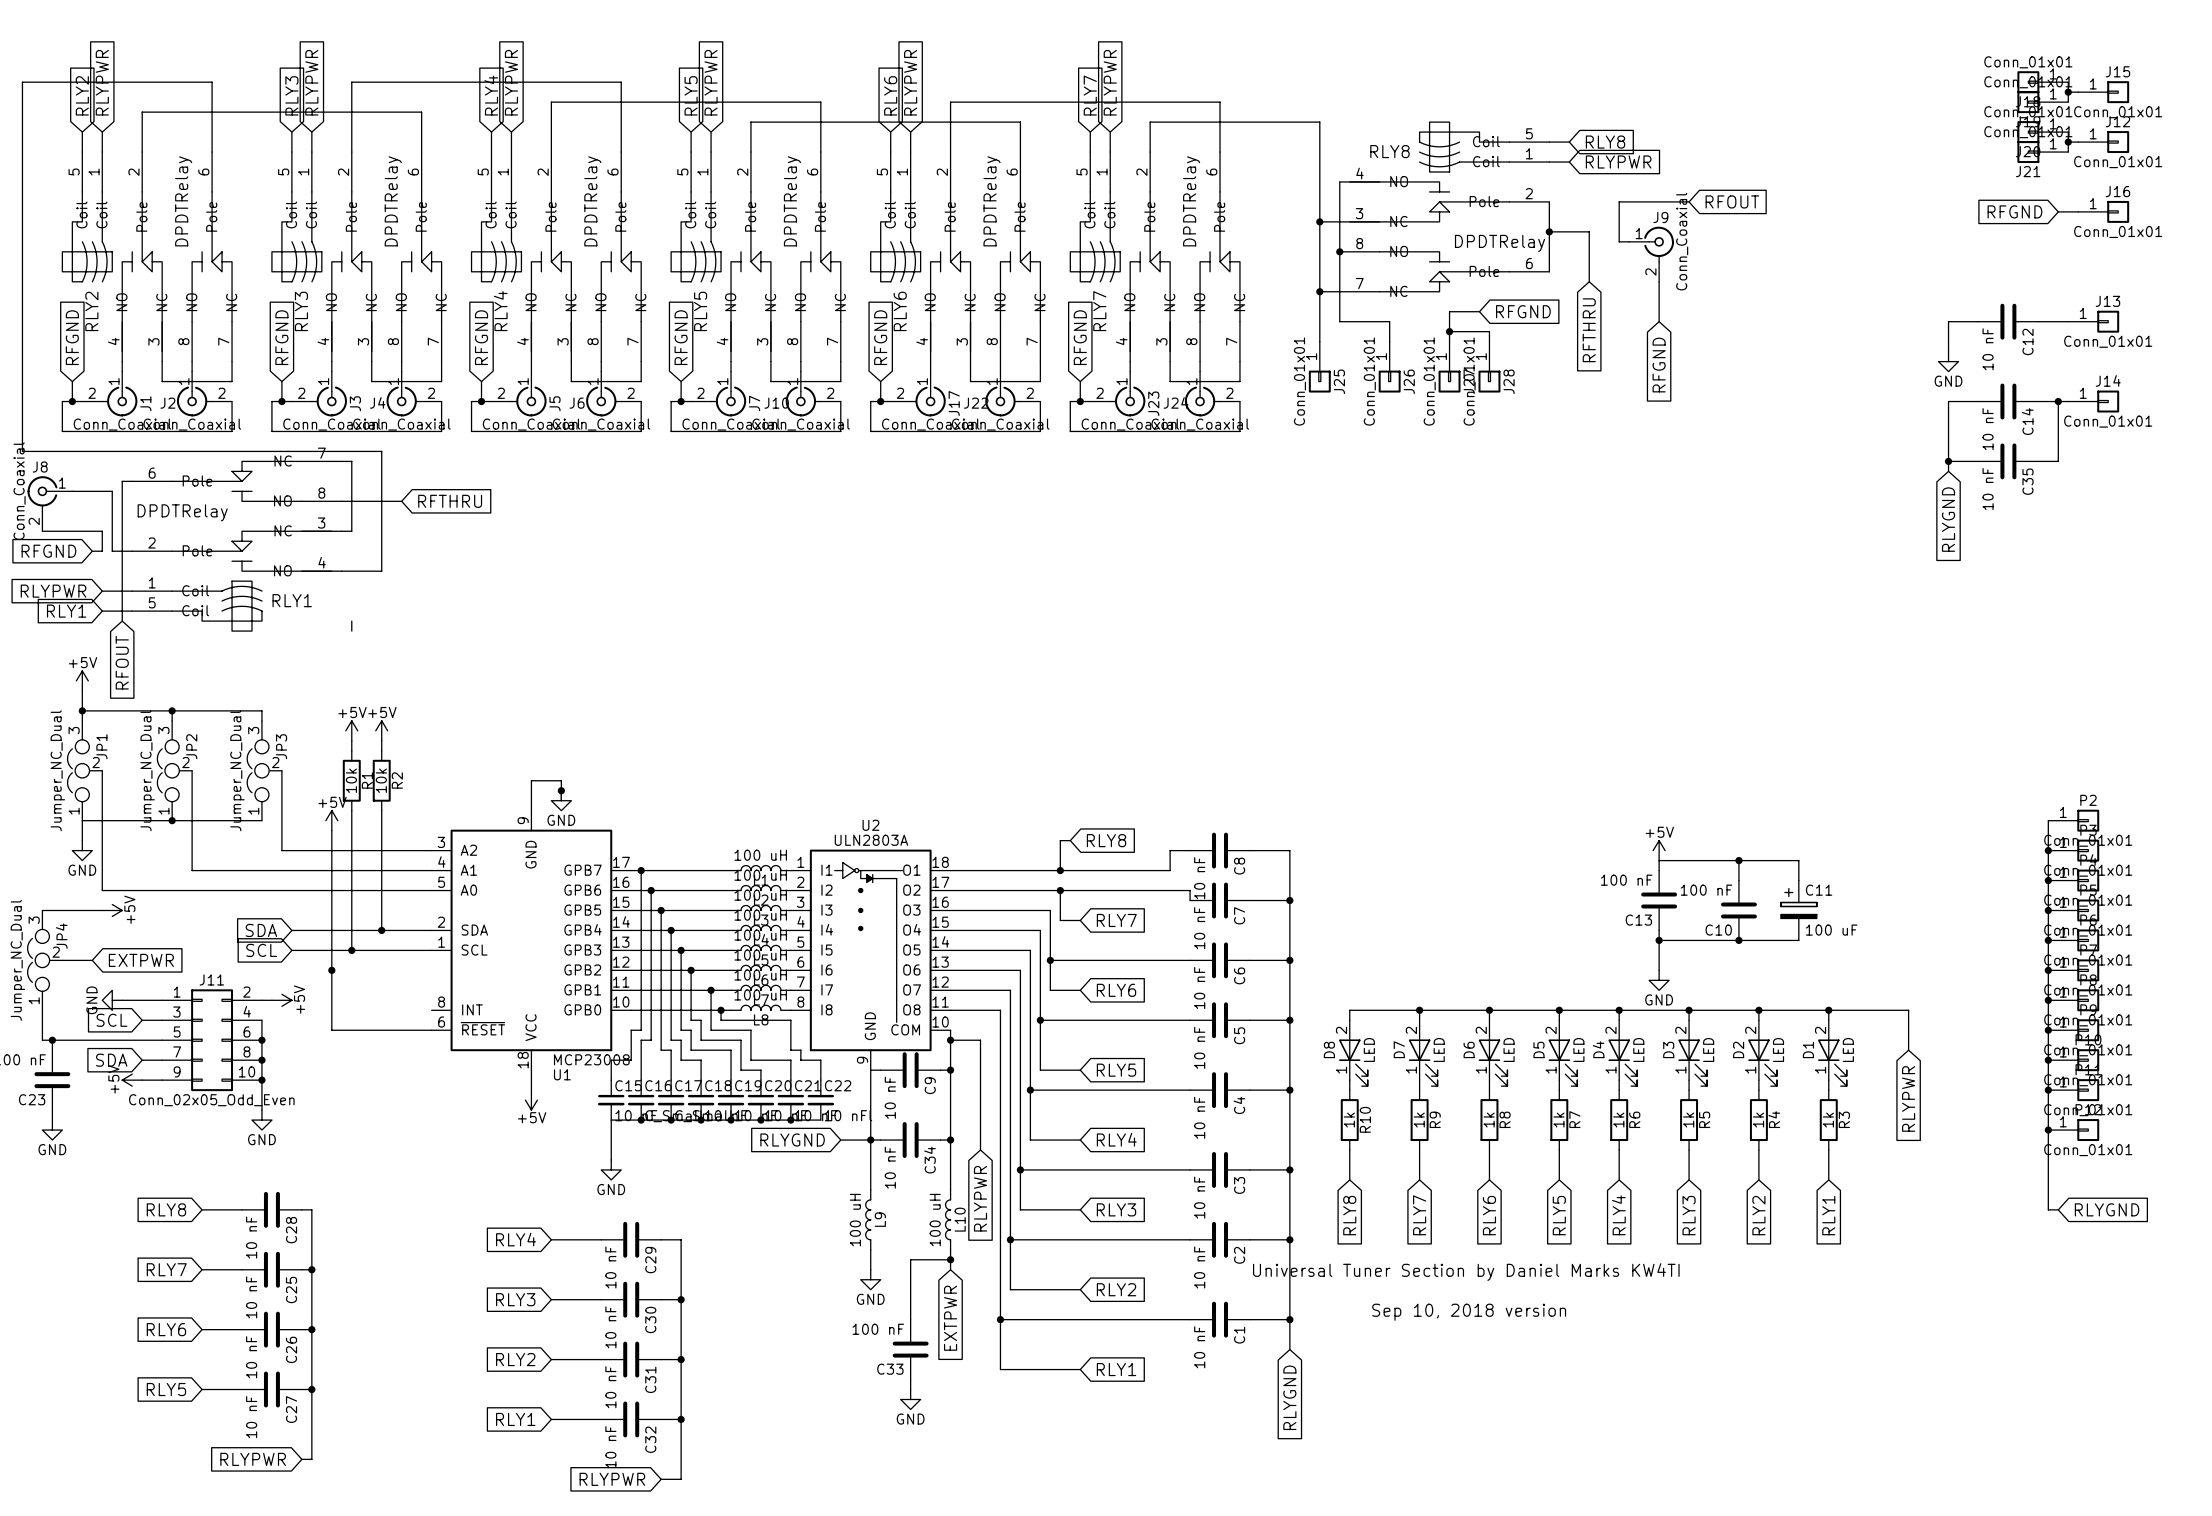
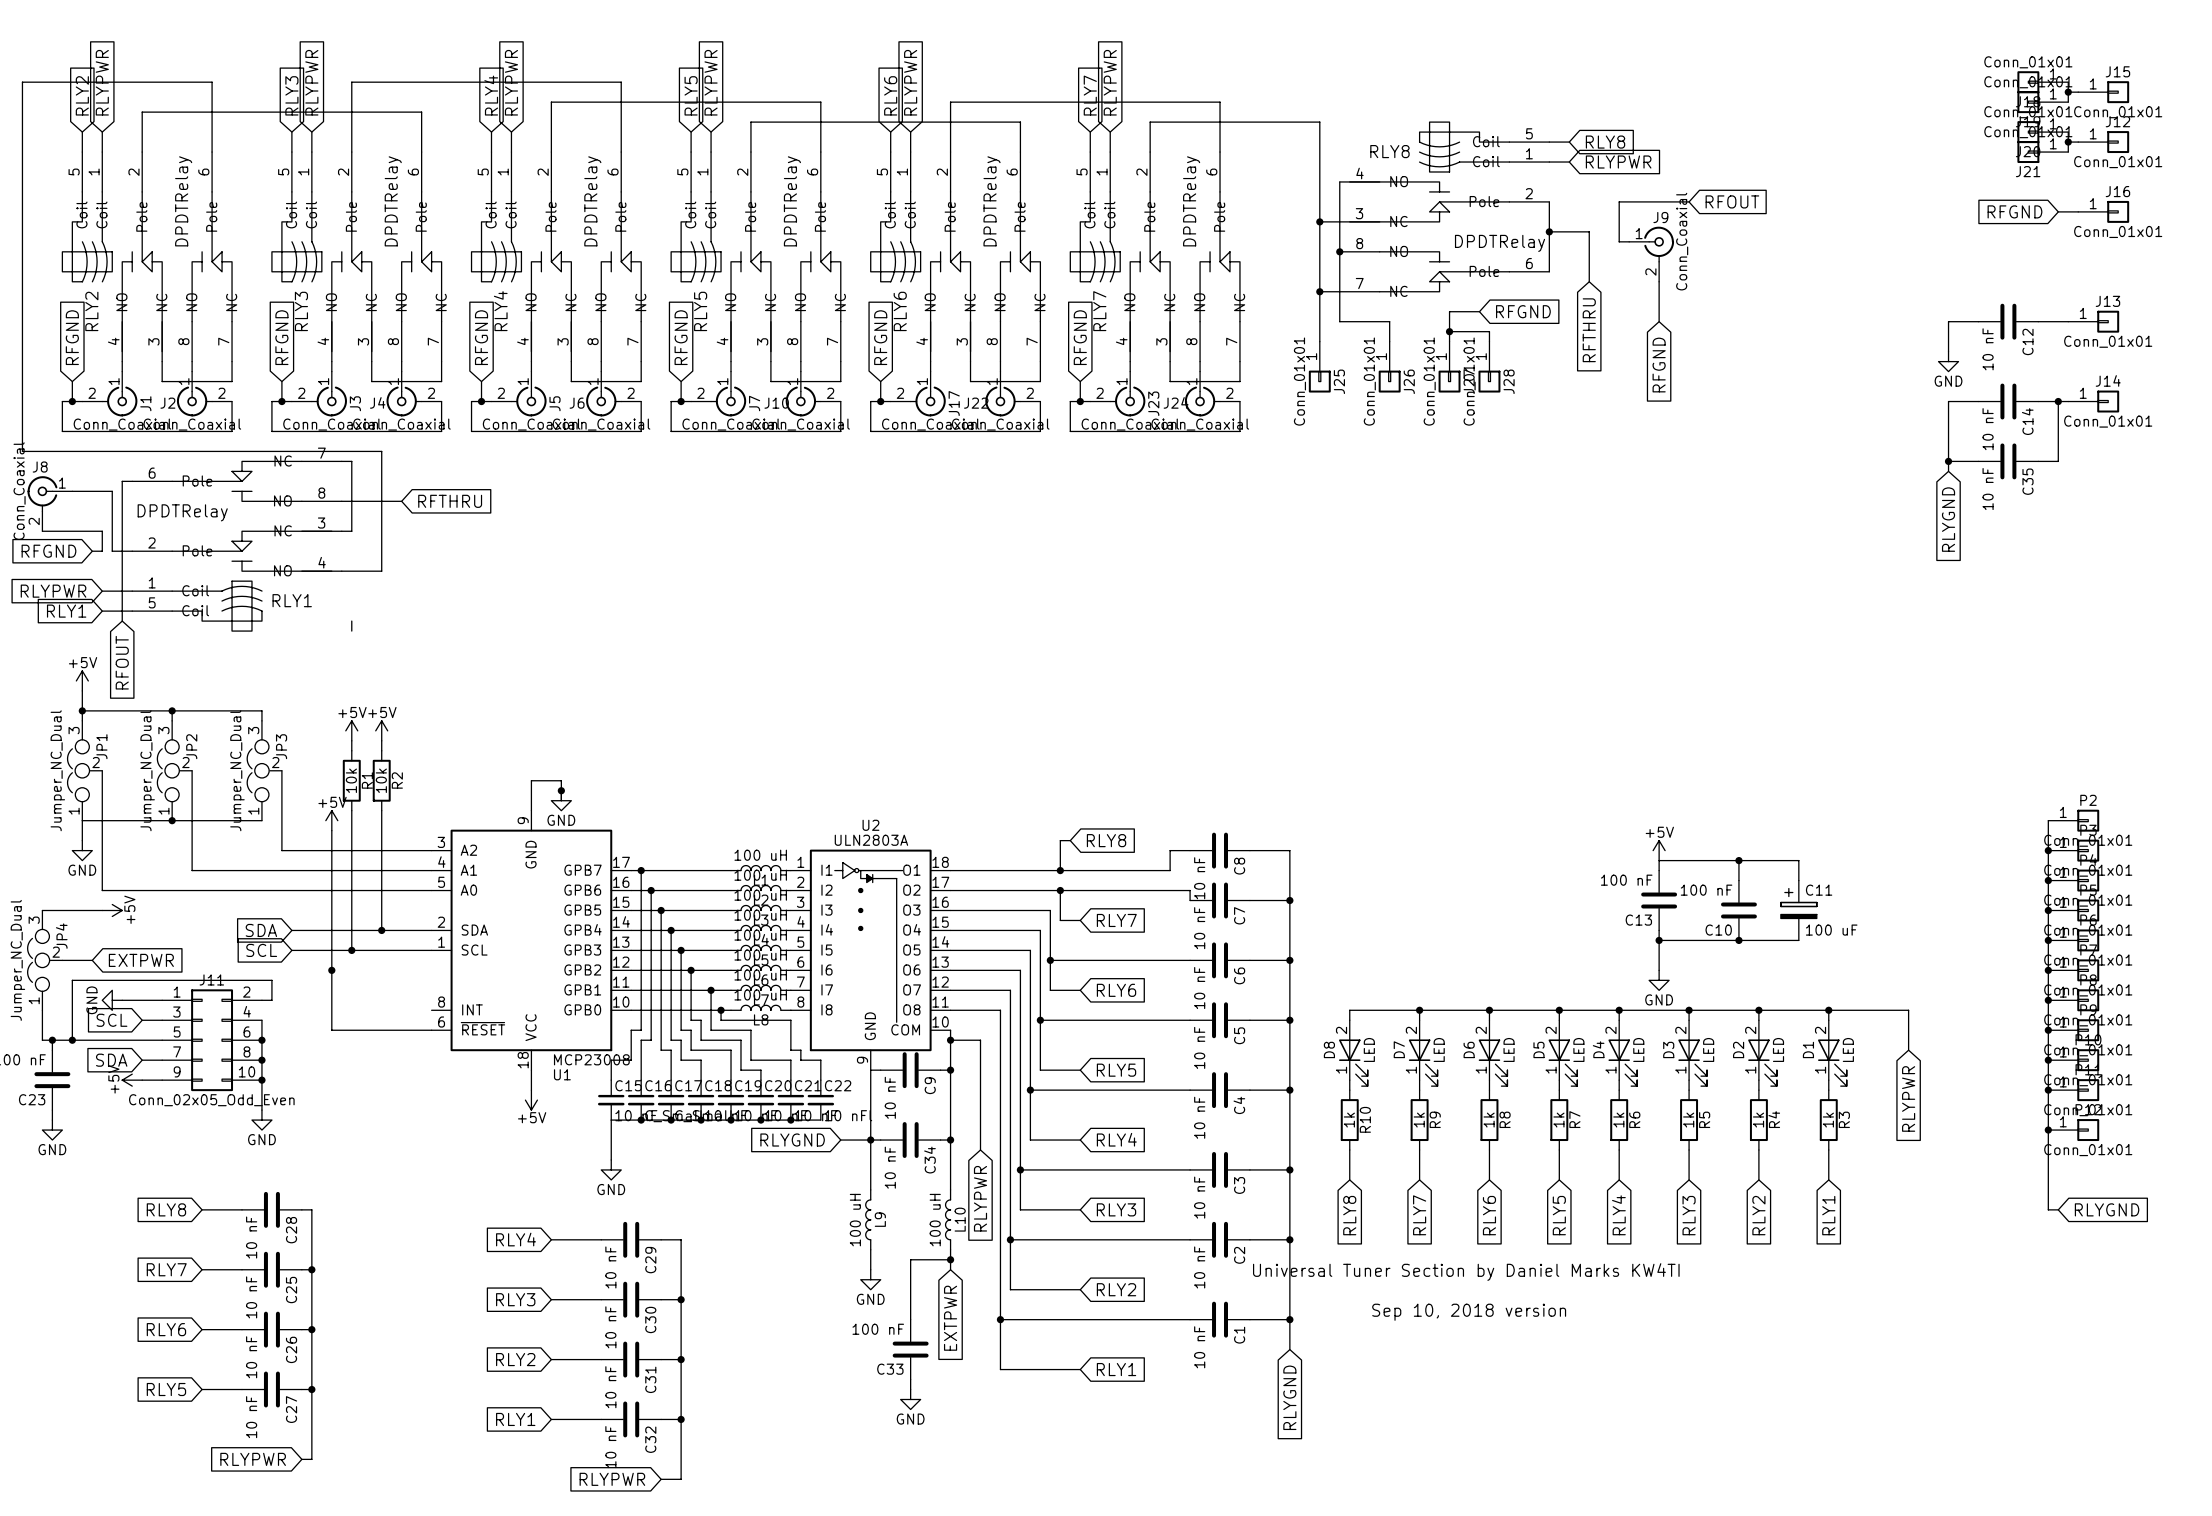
wire: none -> (271, 1000) (271, 980) (72, 980) (72, 1040)
power symbol: +5V (281, 1000) -> none
junction: none -> (72, 1040)

